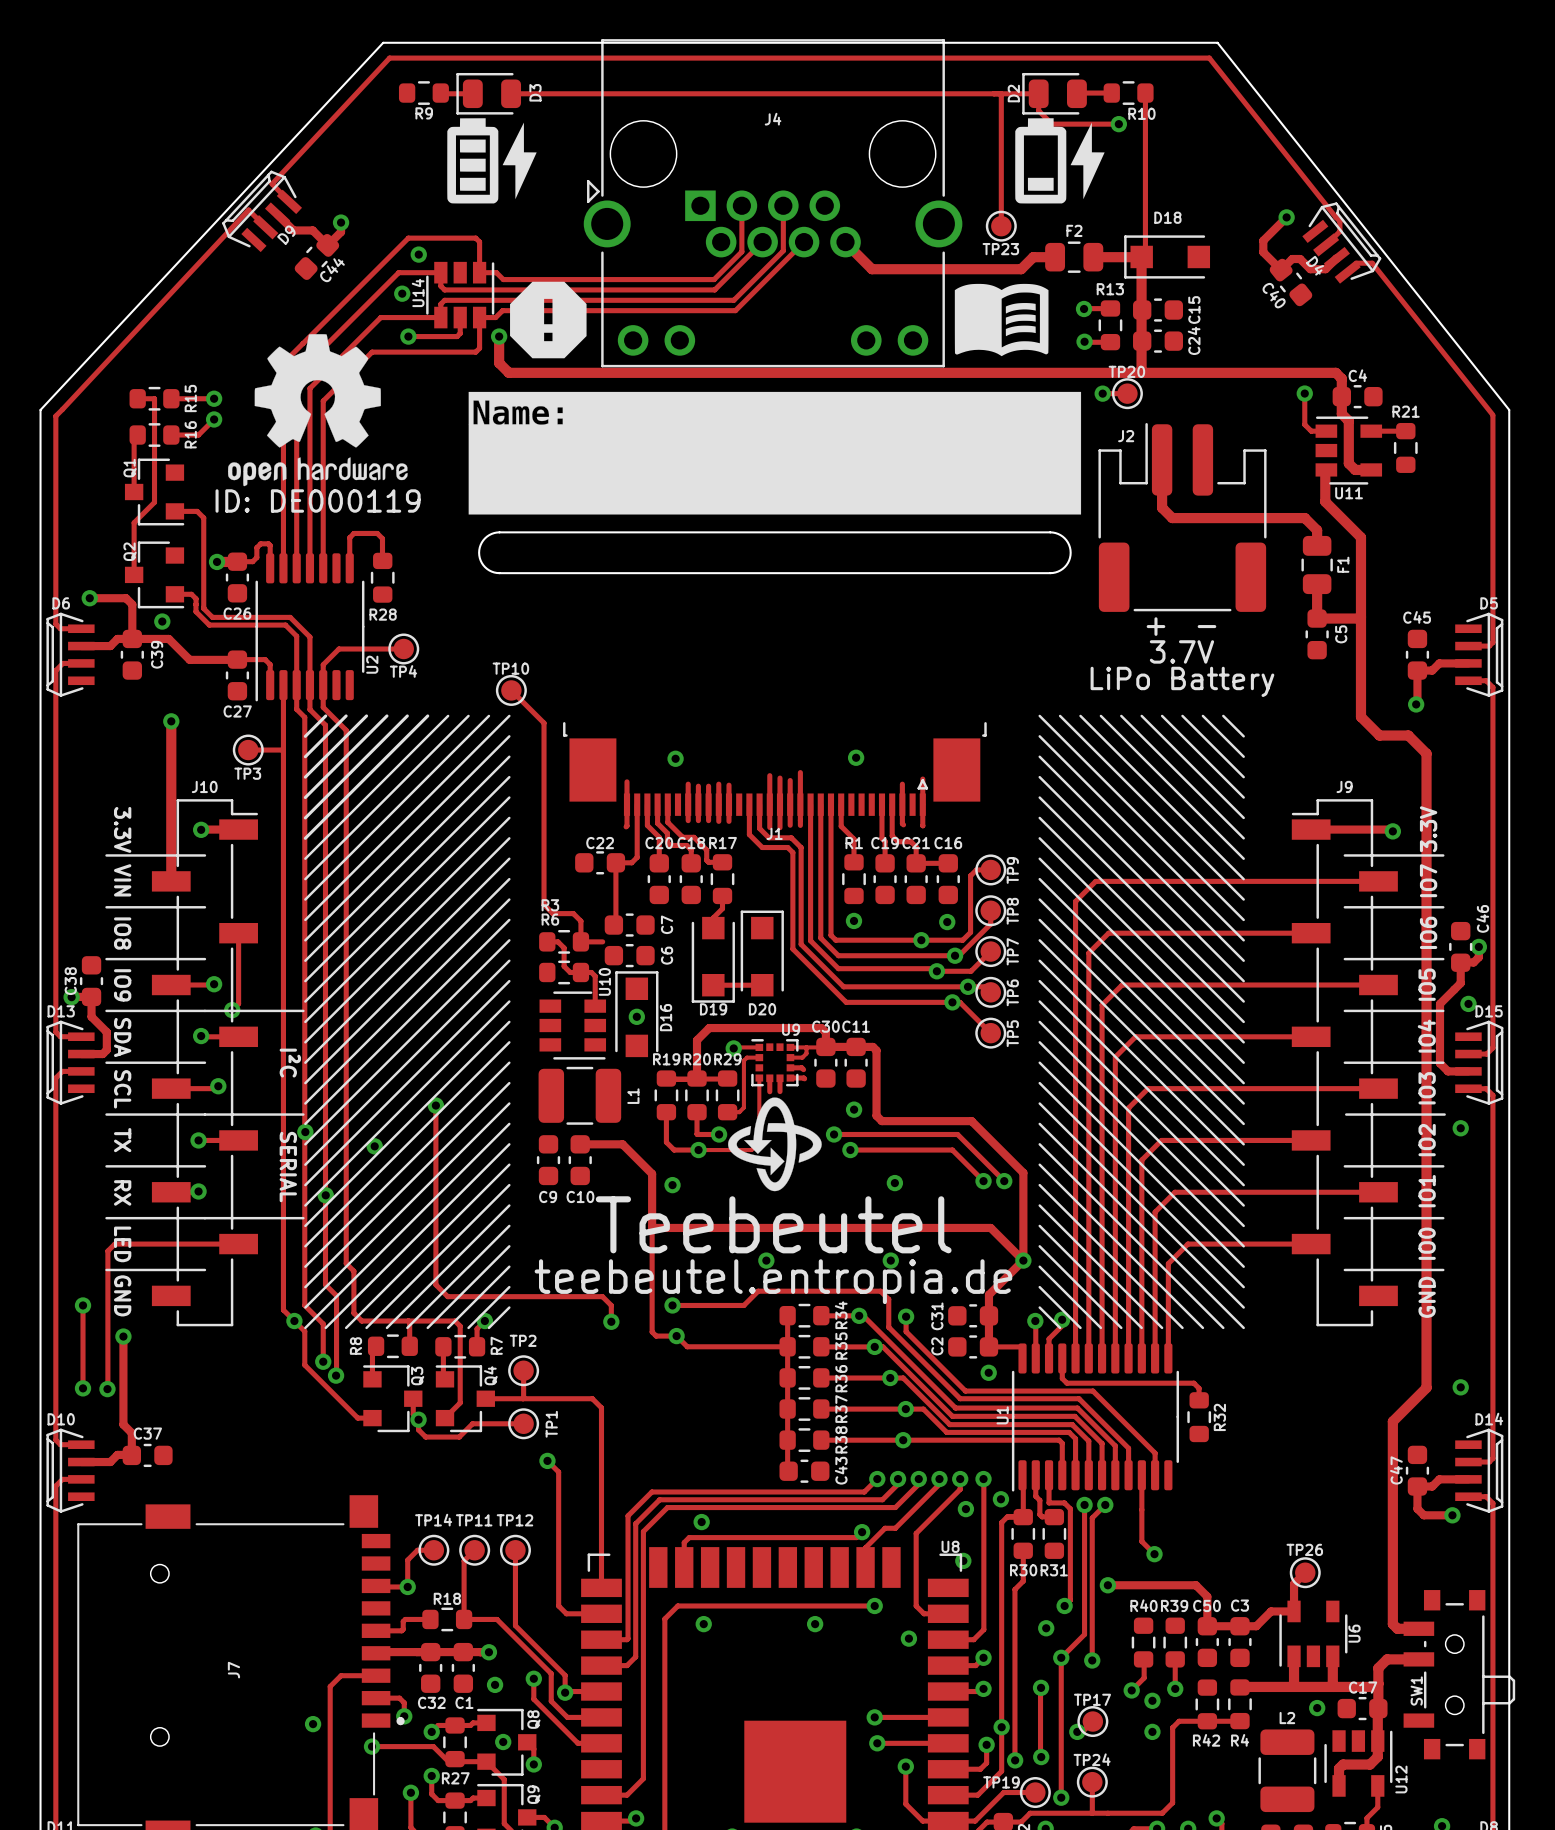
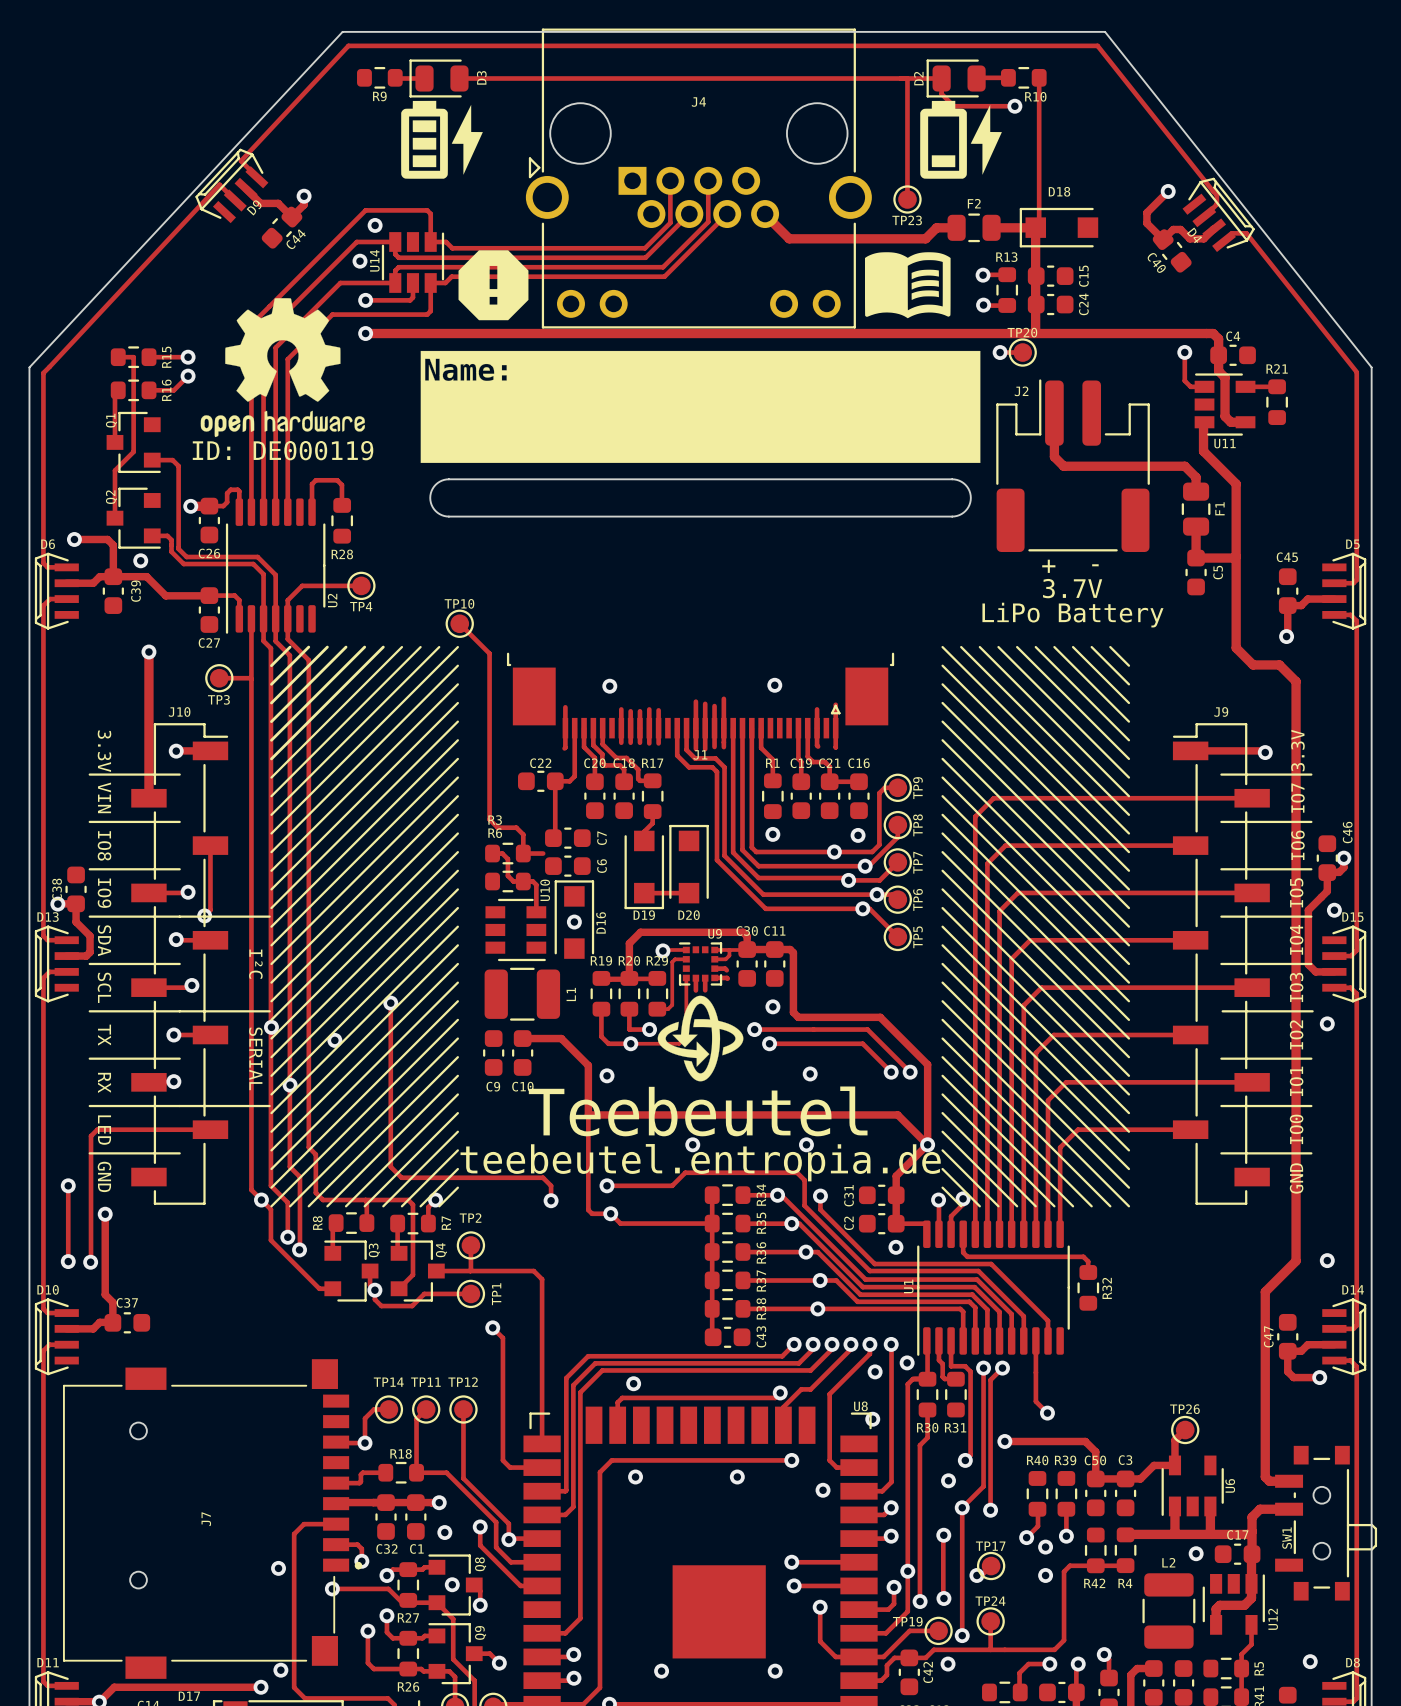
track: (499, 336) (499, 363) (508, 372) -> (365, 333) (457, 333)
via position: (499, 336) -> (365, 333)

